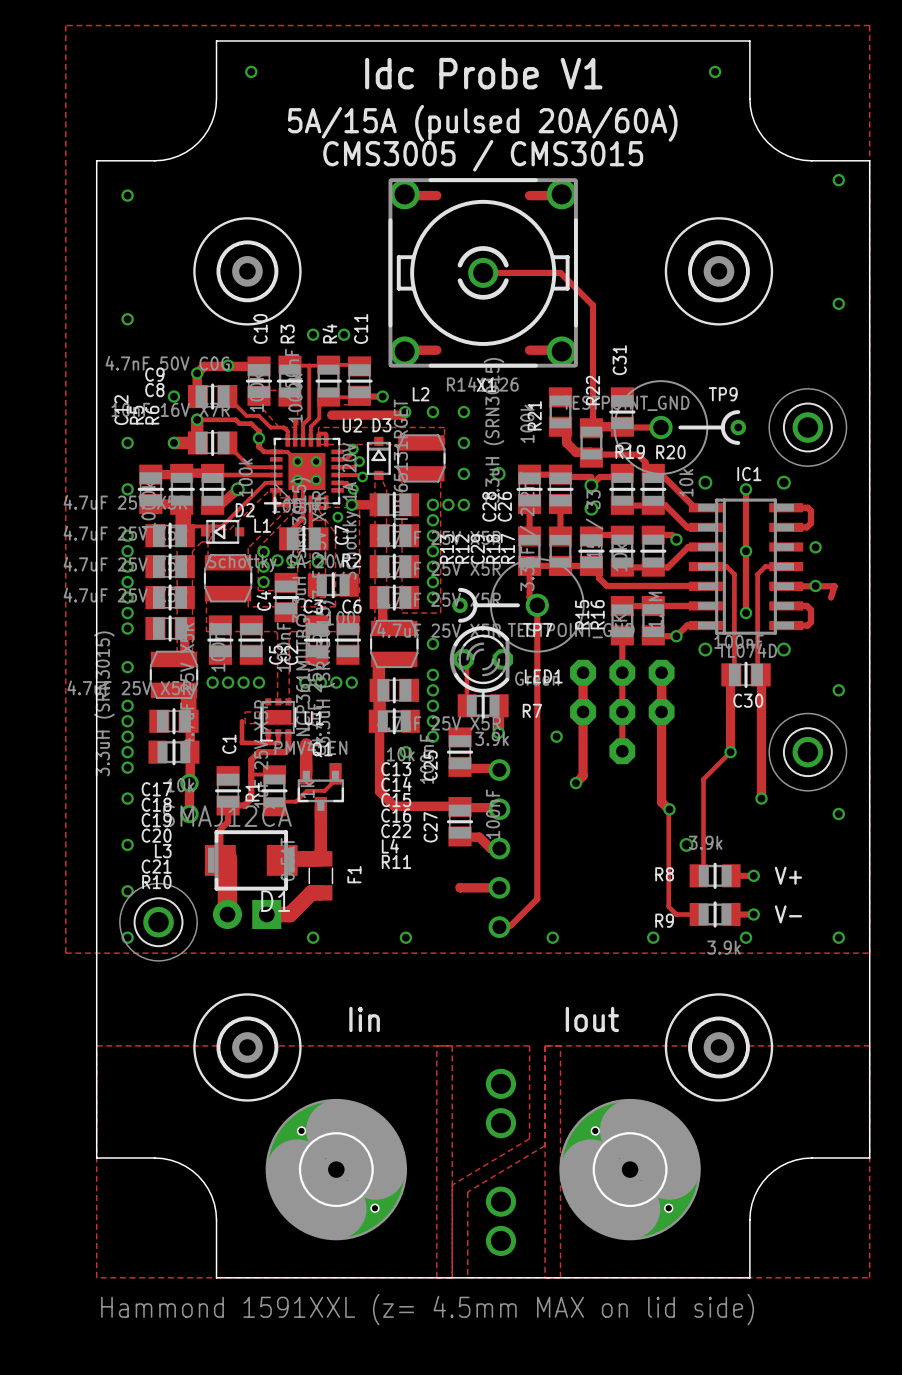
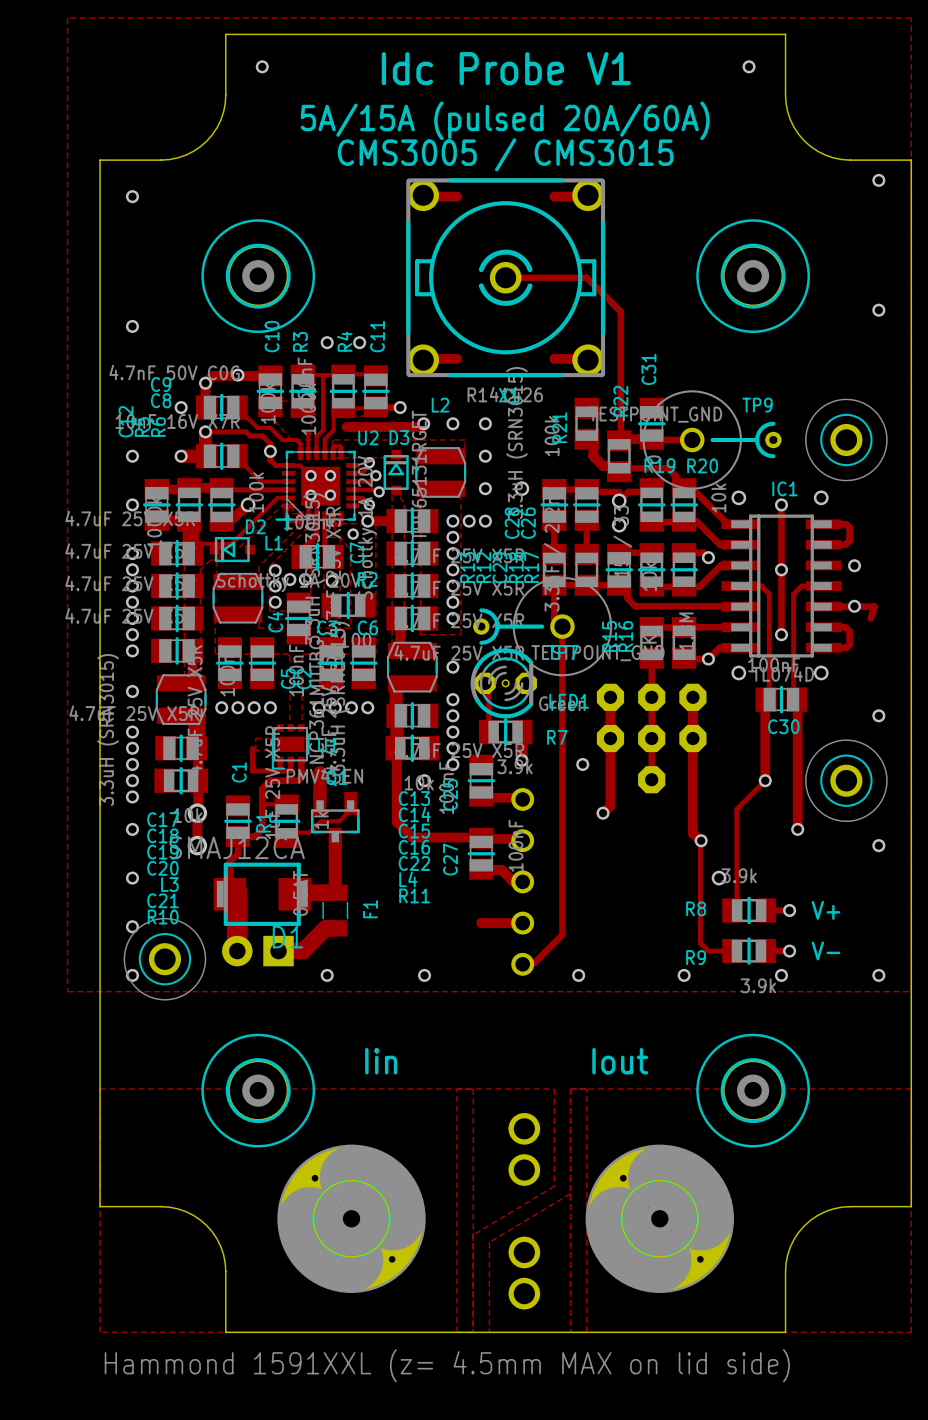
hole: none -> (505, 683)

